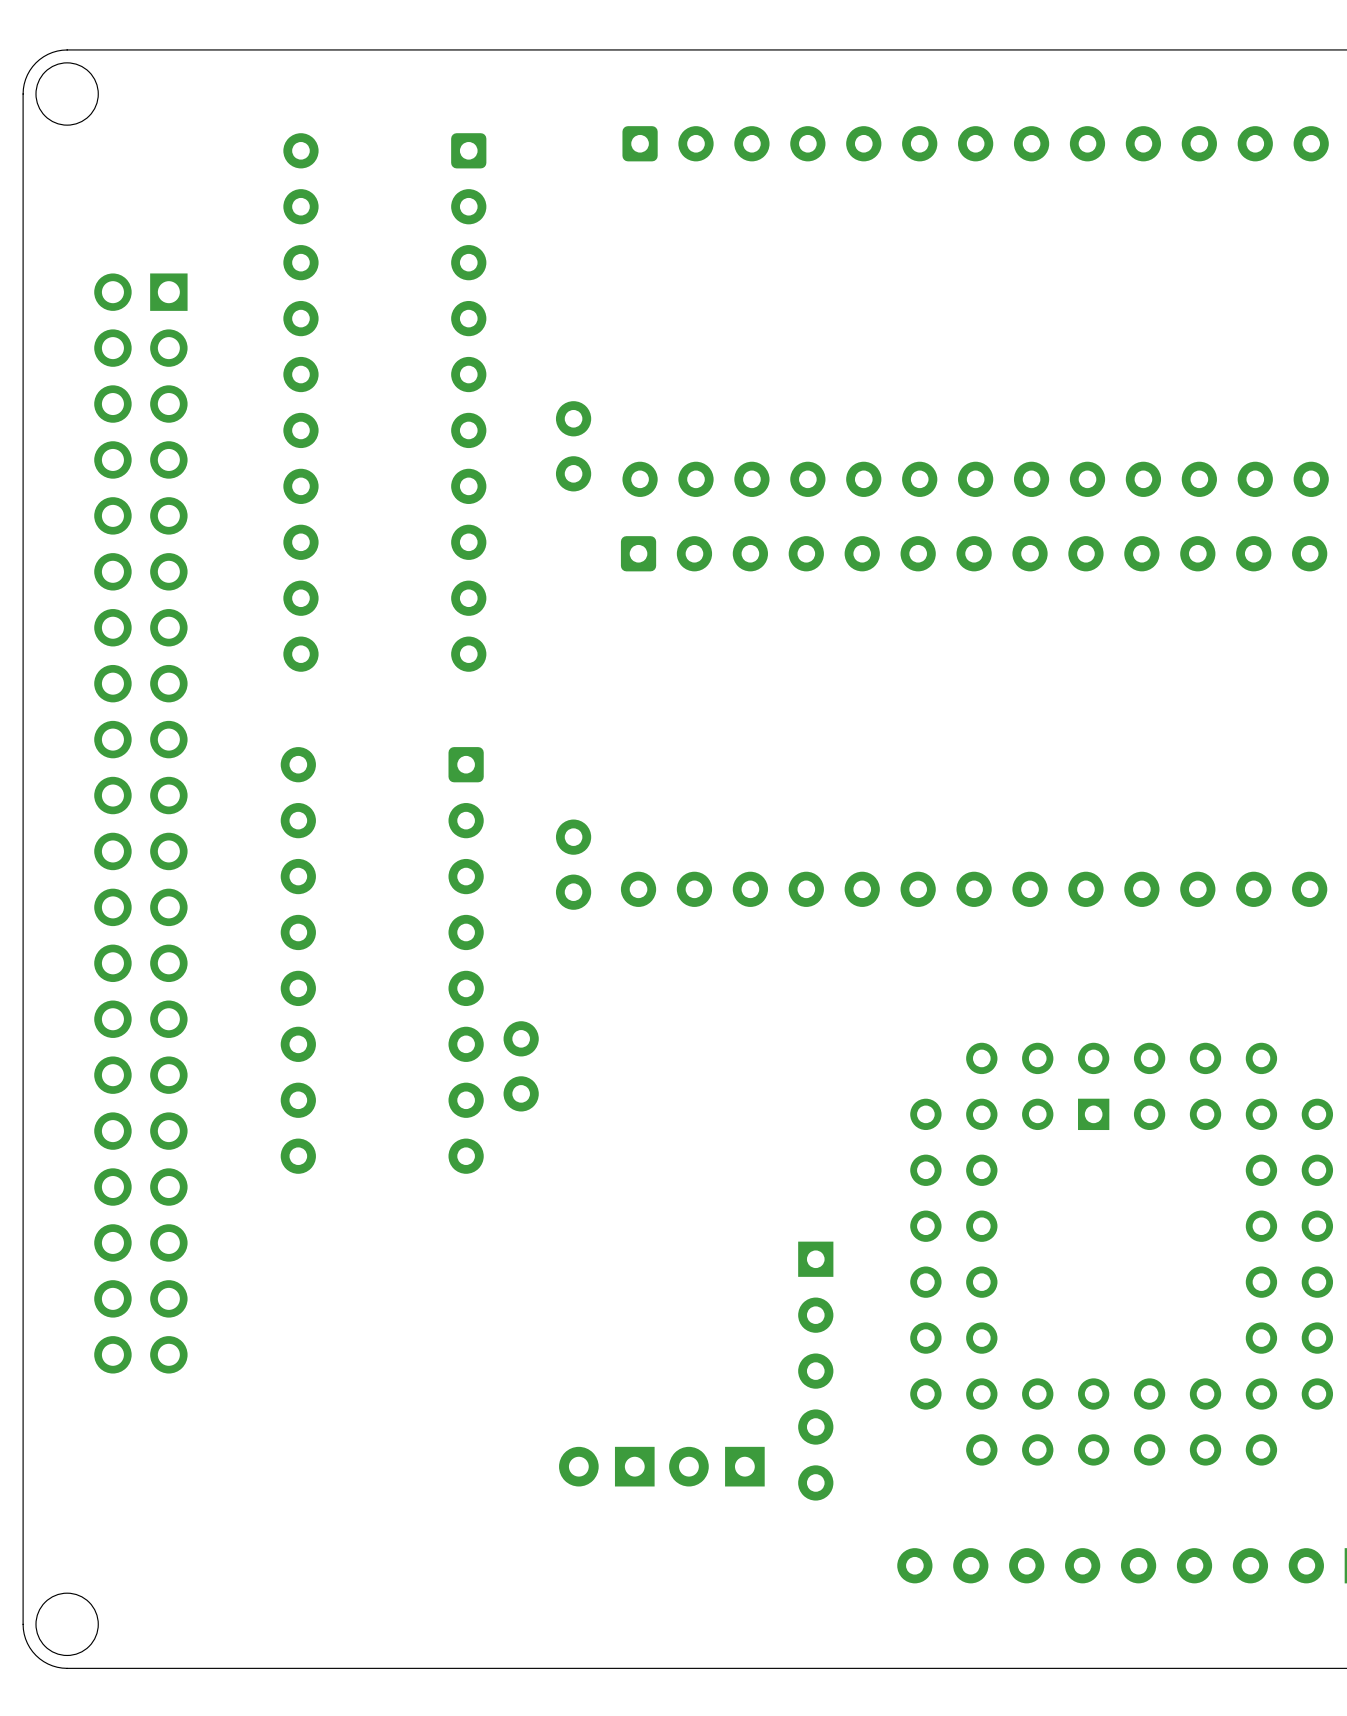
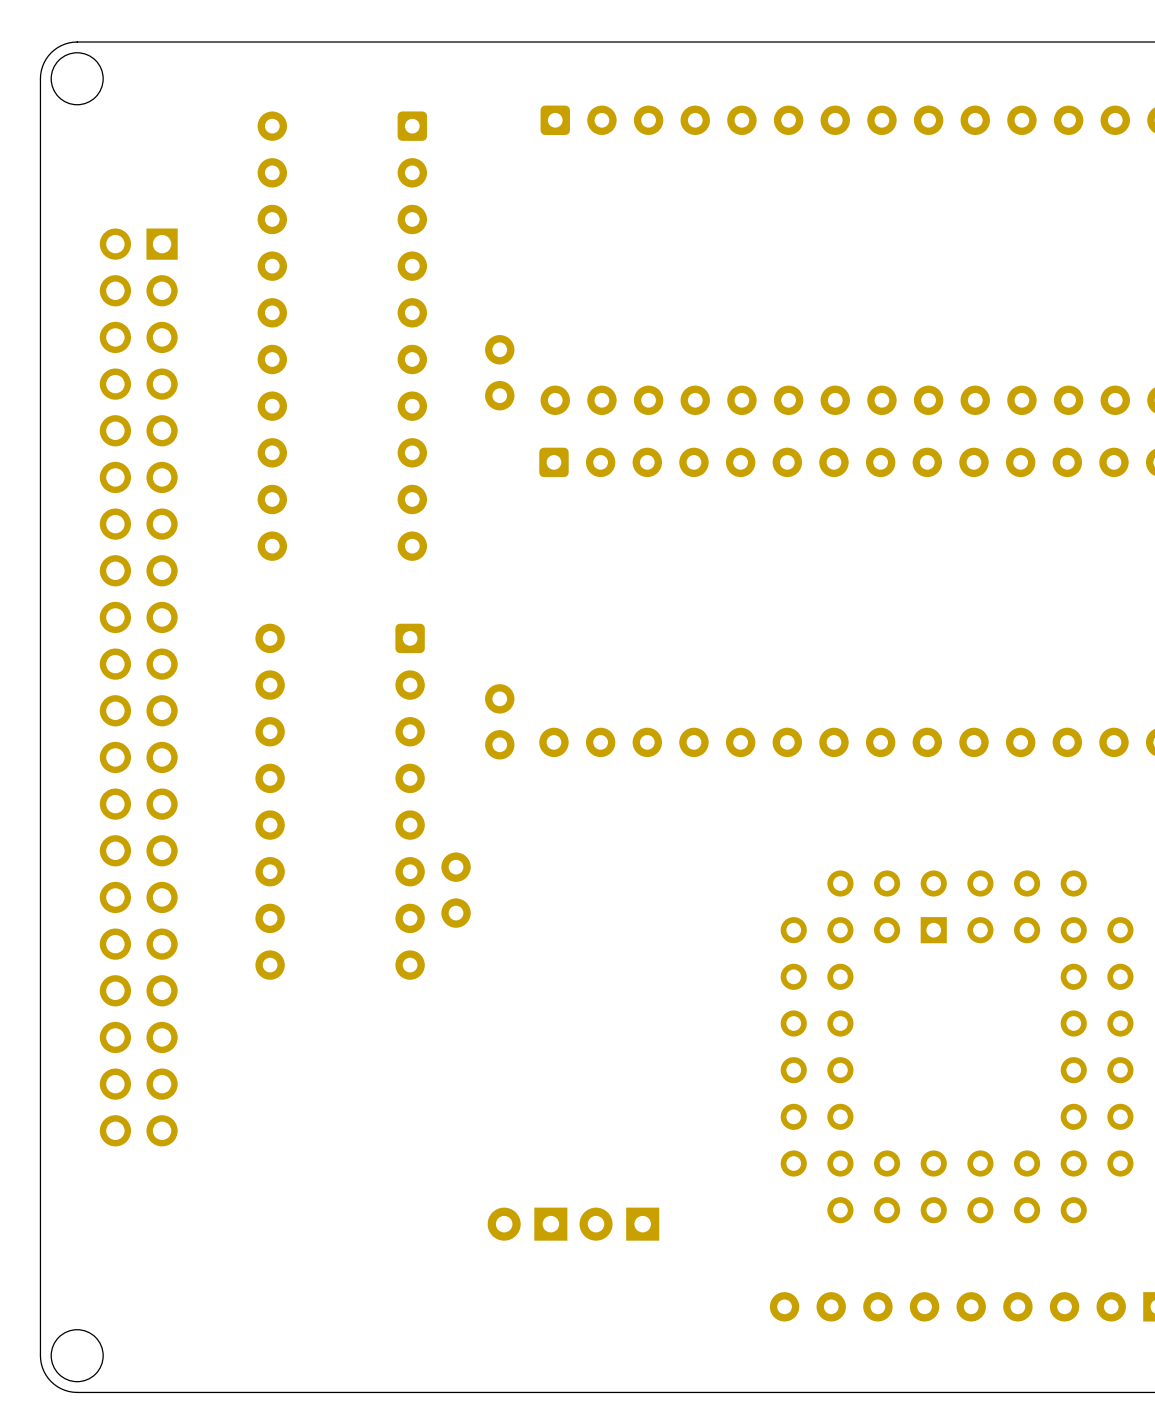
part: (815, 1371) -> none

